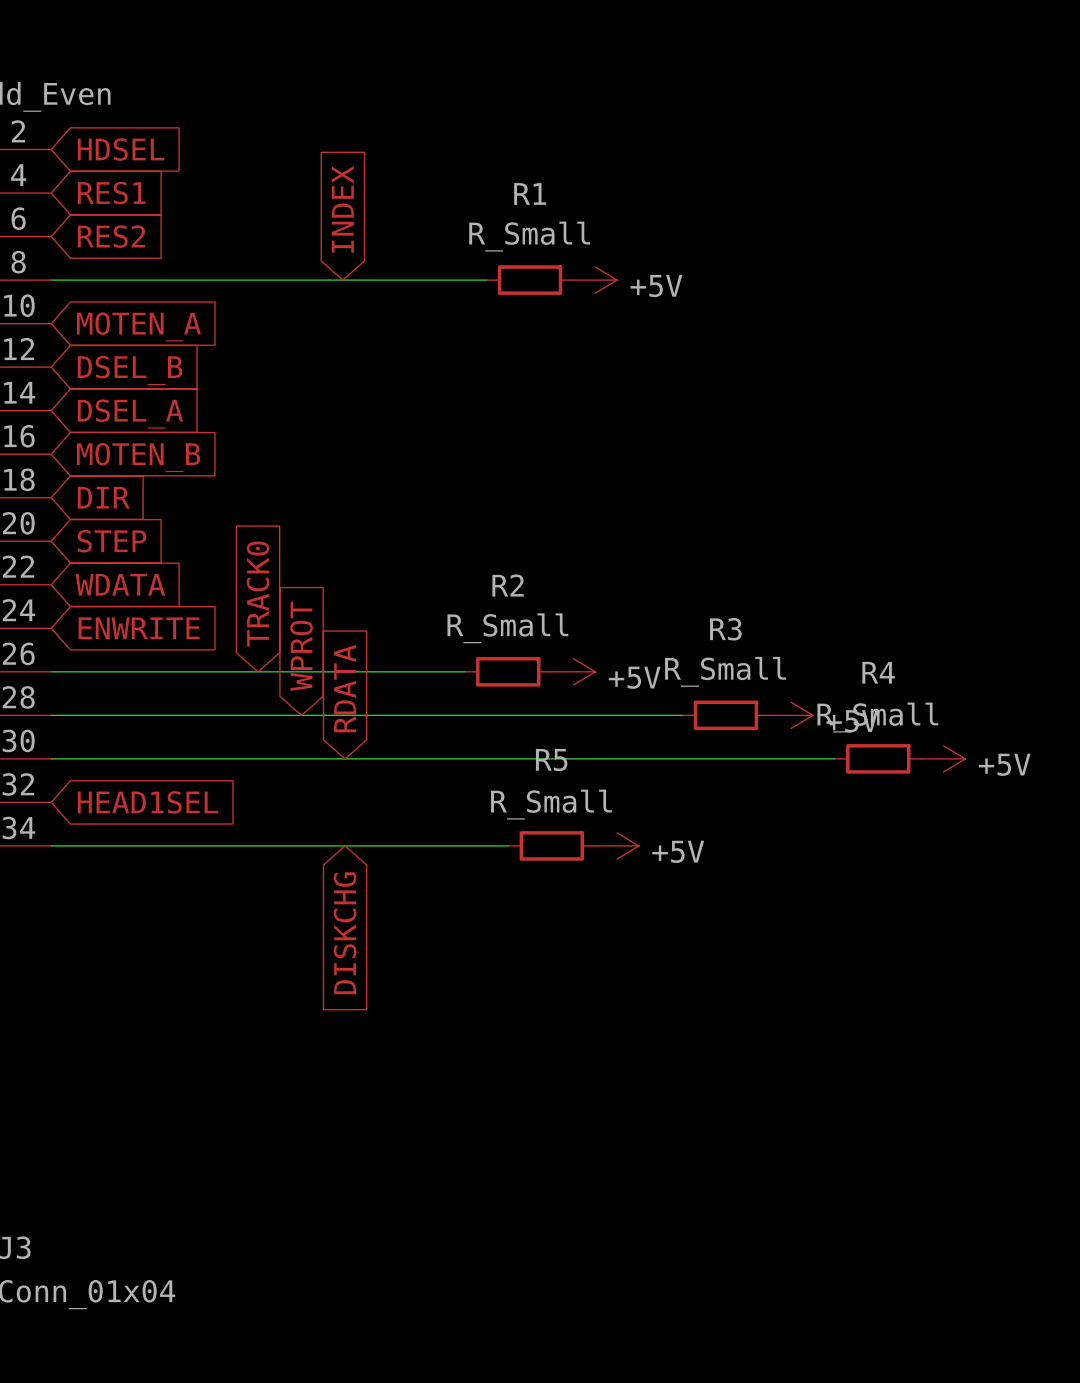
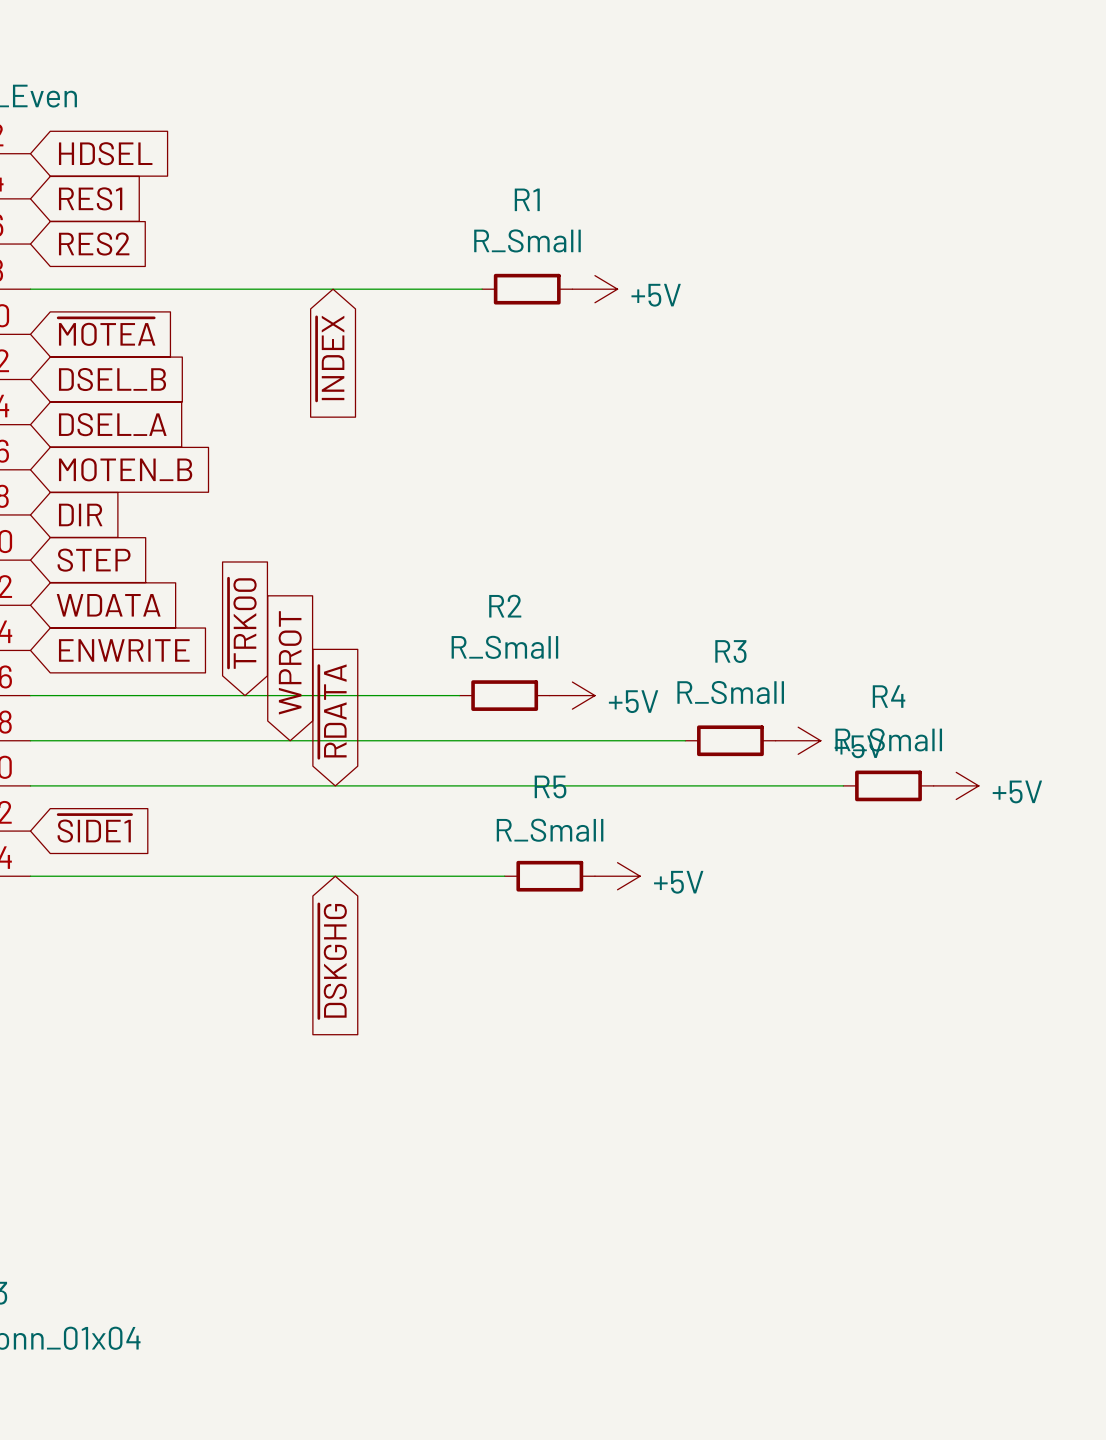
global label: INDEX (342, 209) -> ~{INDEX} (330, 358)
global label: MOTEN_A (139, 326) -> ~{MOTEA} (106, 331)
global label: TRACK0 (258, 594) -> ~{TRK00} (242, 623)
global label: RDATA (345, 688) -> ~{RDATA} (332, 711)
global label: HEAD1SEL (147, 802) -> ~{SIDE1} (94, 828)
global label: DISKCHG (345, 933) -> ~{DSKGHG} (332, 961)

